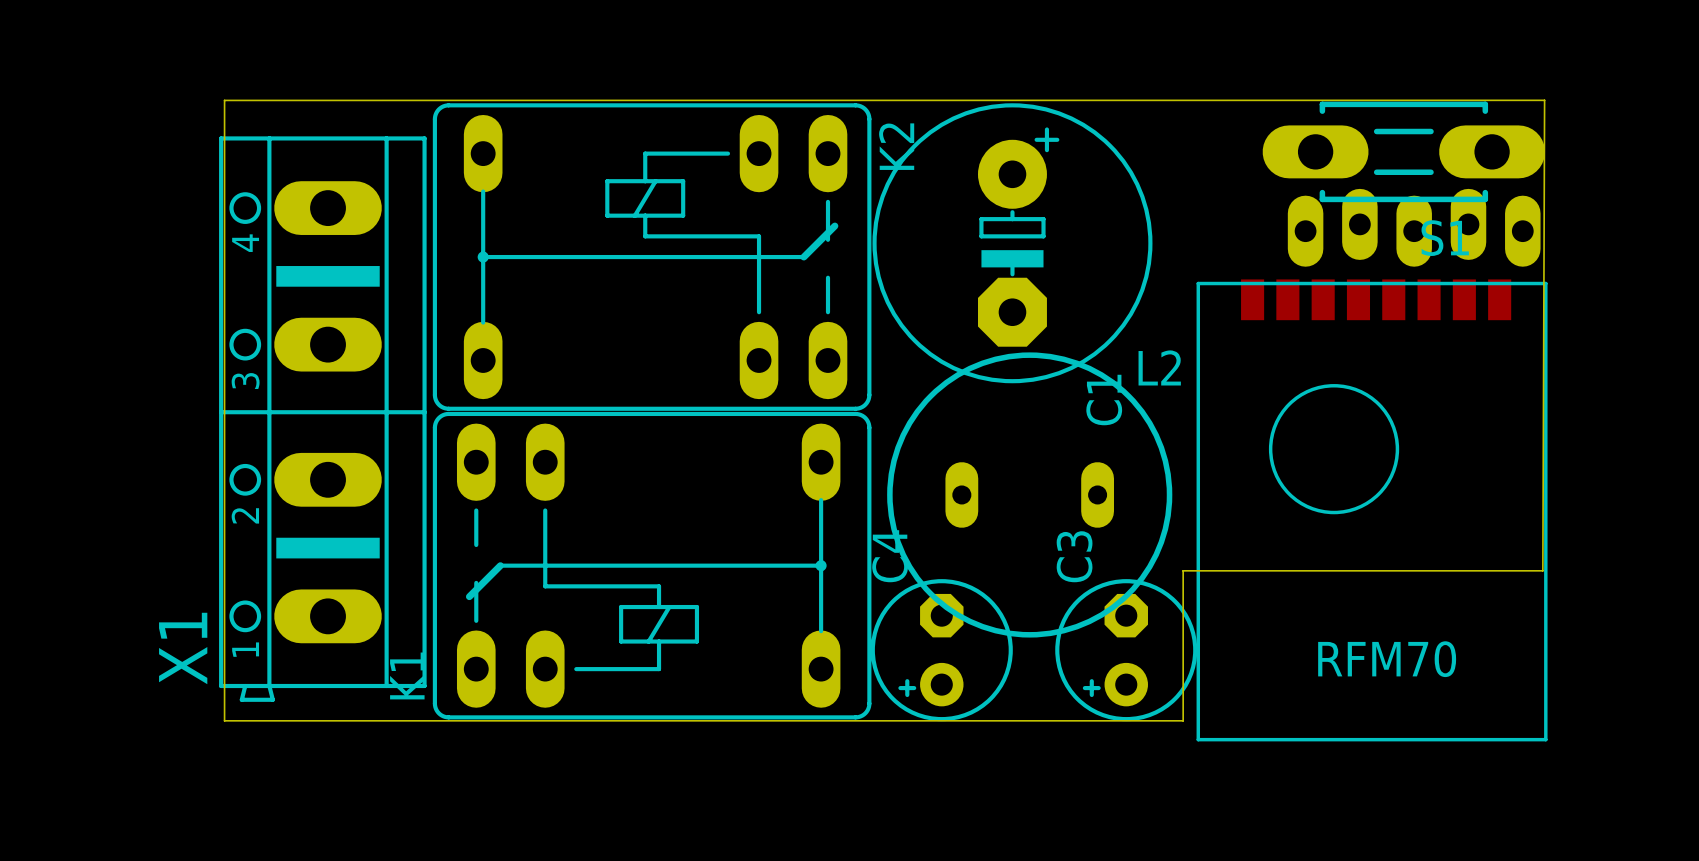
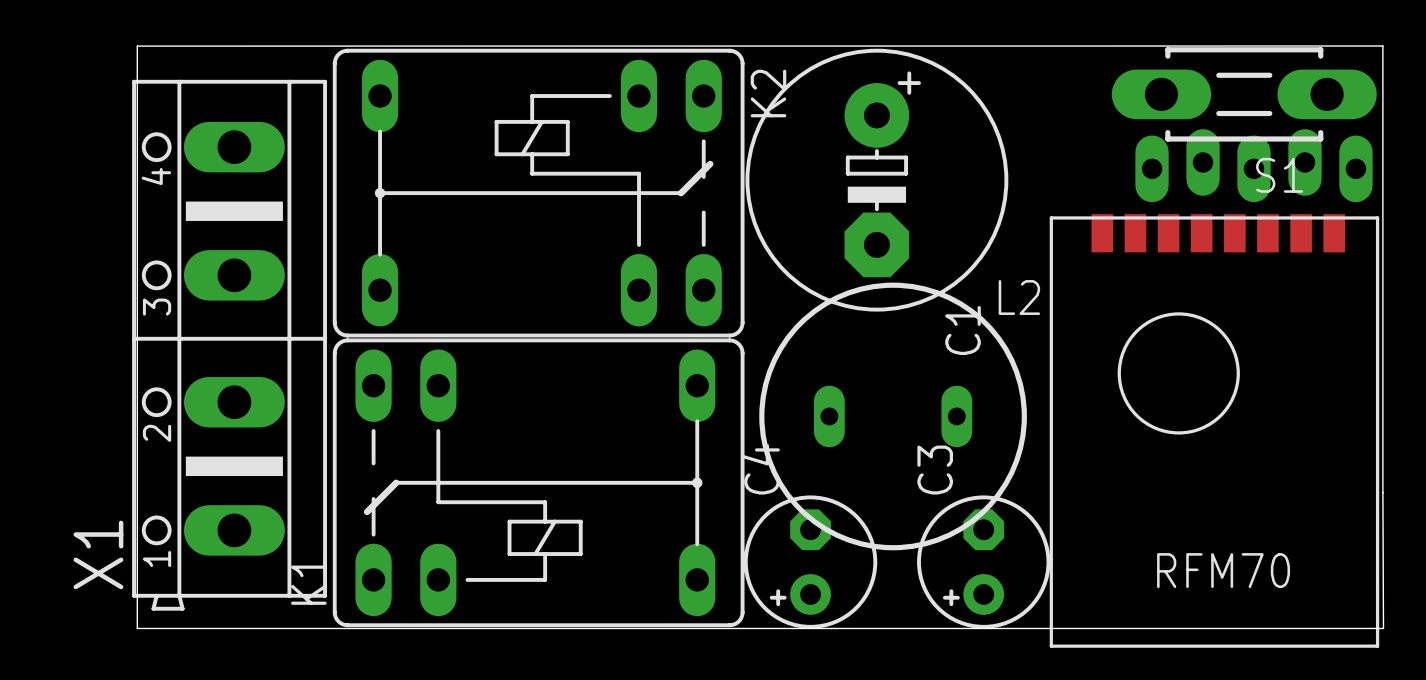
board edge: (1544, 100) (1542, 570) (1183, 570) (1183, 720) -> (1376, 46) (1382, 46) (1383, 628) (1037, 628)

